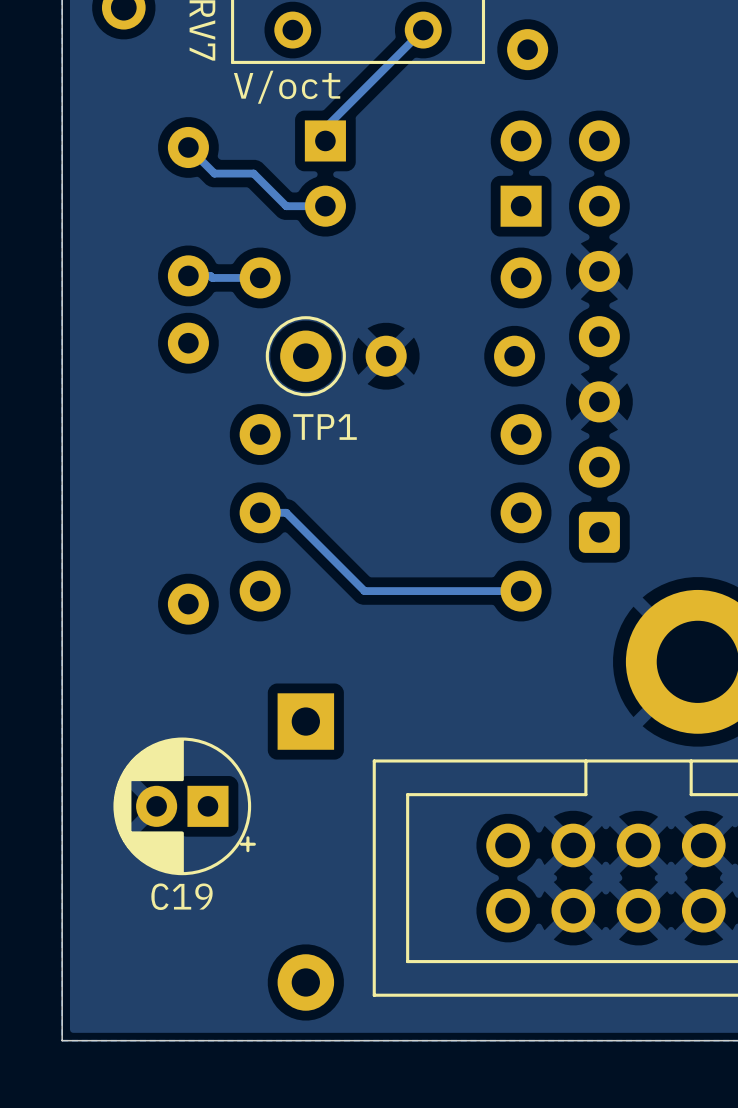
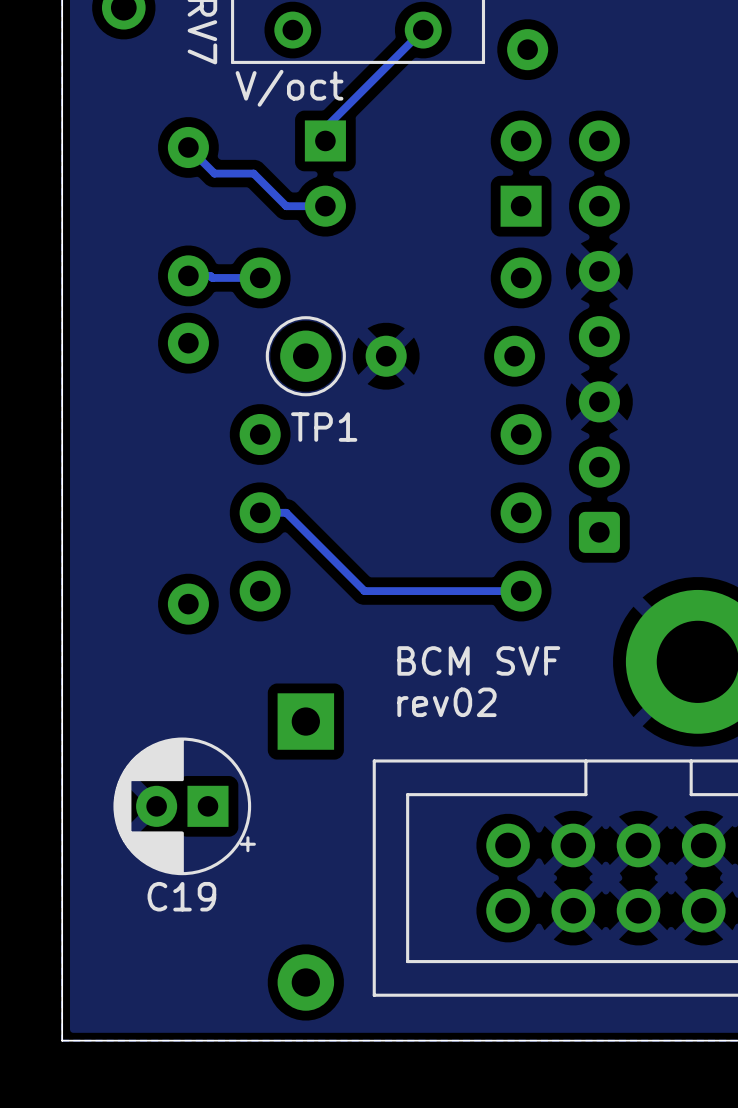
text: none -> BCM SVF (478, 660)
text: none -> rev02 (446, 702)

